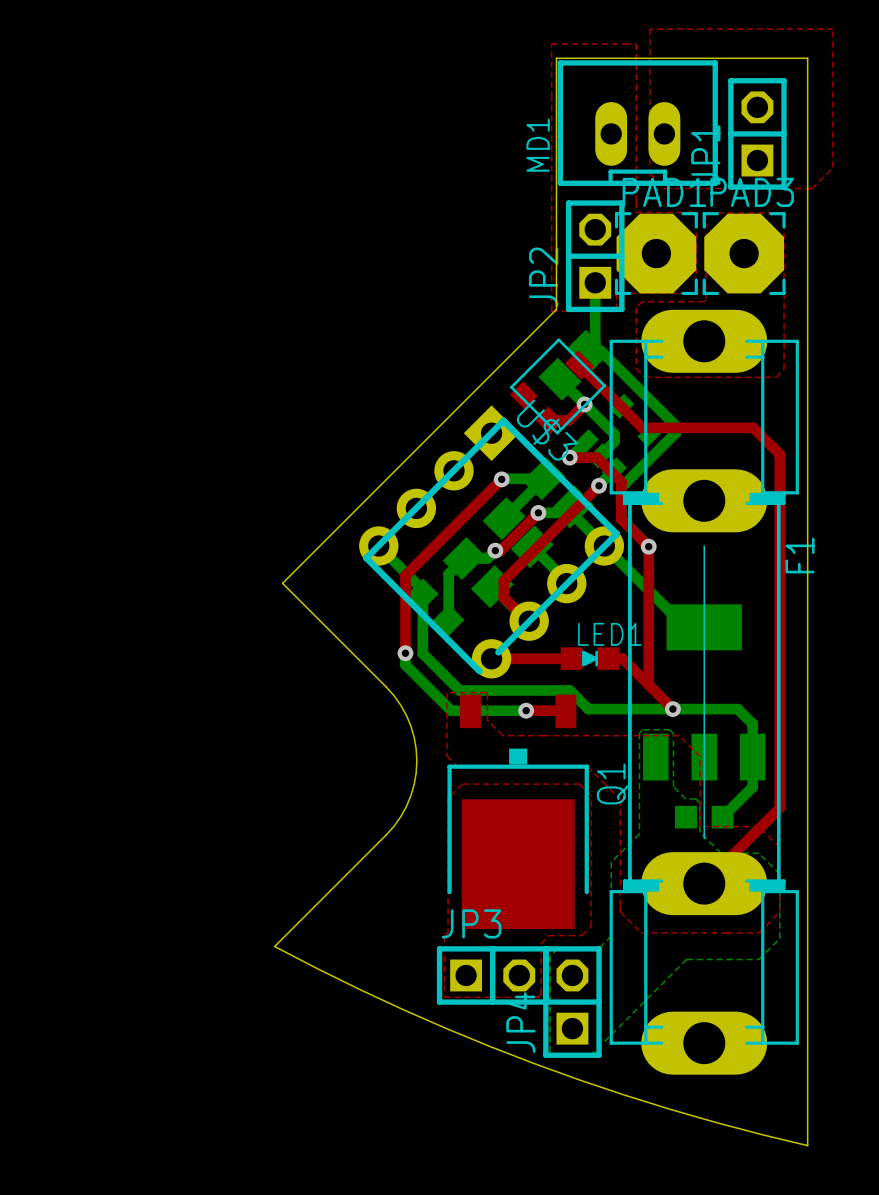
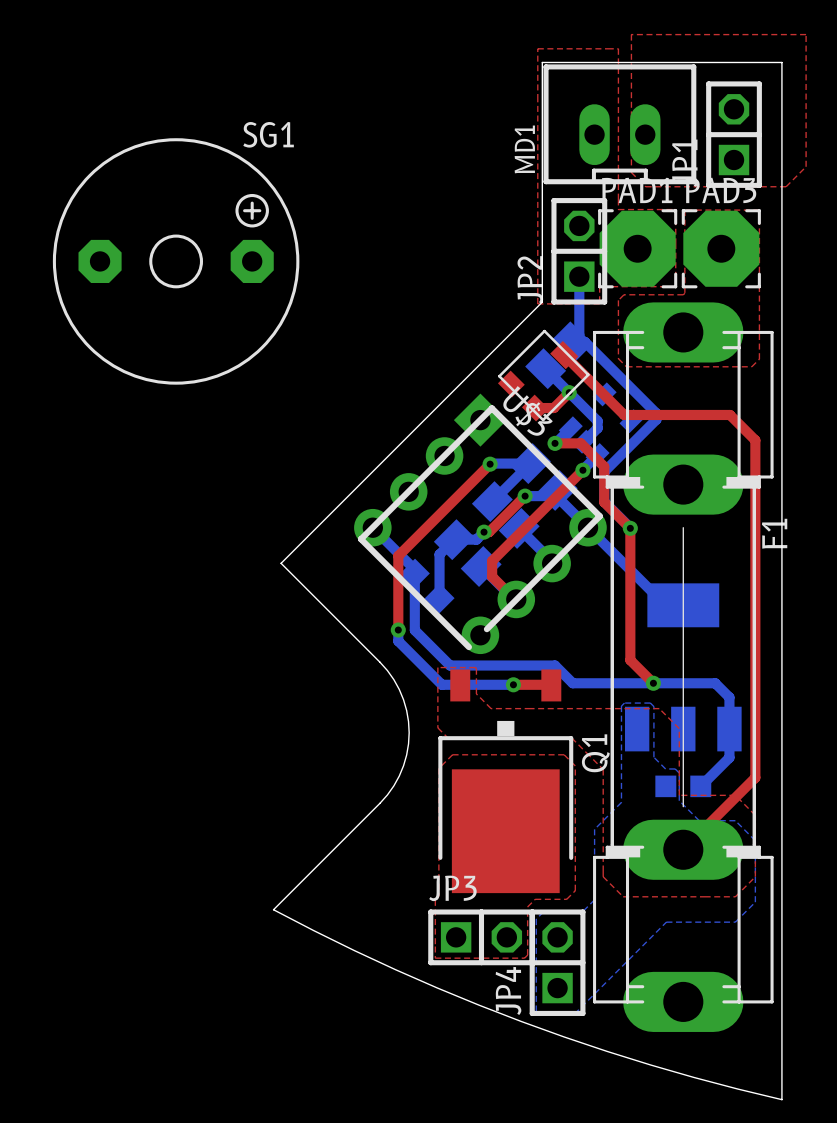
SG1: none -> (176, 261)
top track: (491, 658) (571, 658) -> none
LED1: (589, 658) -> none
top track: (608, 658) (622, 658) (648, 684) -> none

